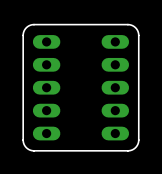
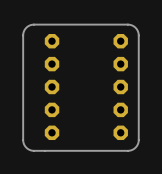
part footprint: [32, 35, 61, 141] -> [44, 79, 60, 95]
part footprint: [101, 35, 130, 141] -> [113, 79, 128, 95]
part: none -> (52, 41)
part: none -> (120, 41)
part: none -> (52, 64)
part: none -> (120, 64)
part: none -> (52, 109)
part: none -> (120, 109)
part: none -> (52, 132)
part: none -> (120, 132)

